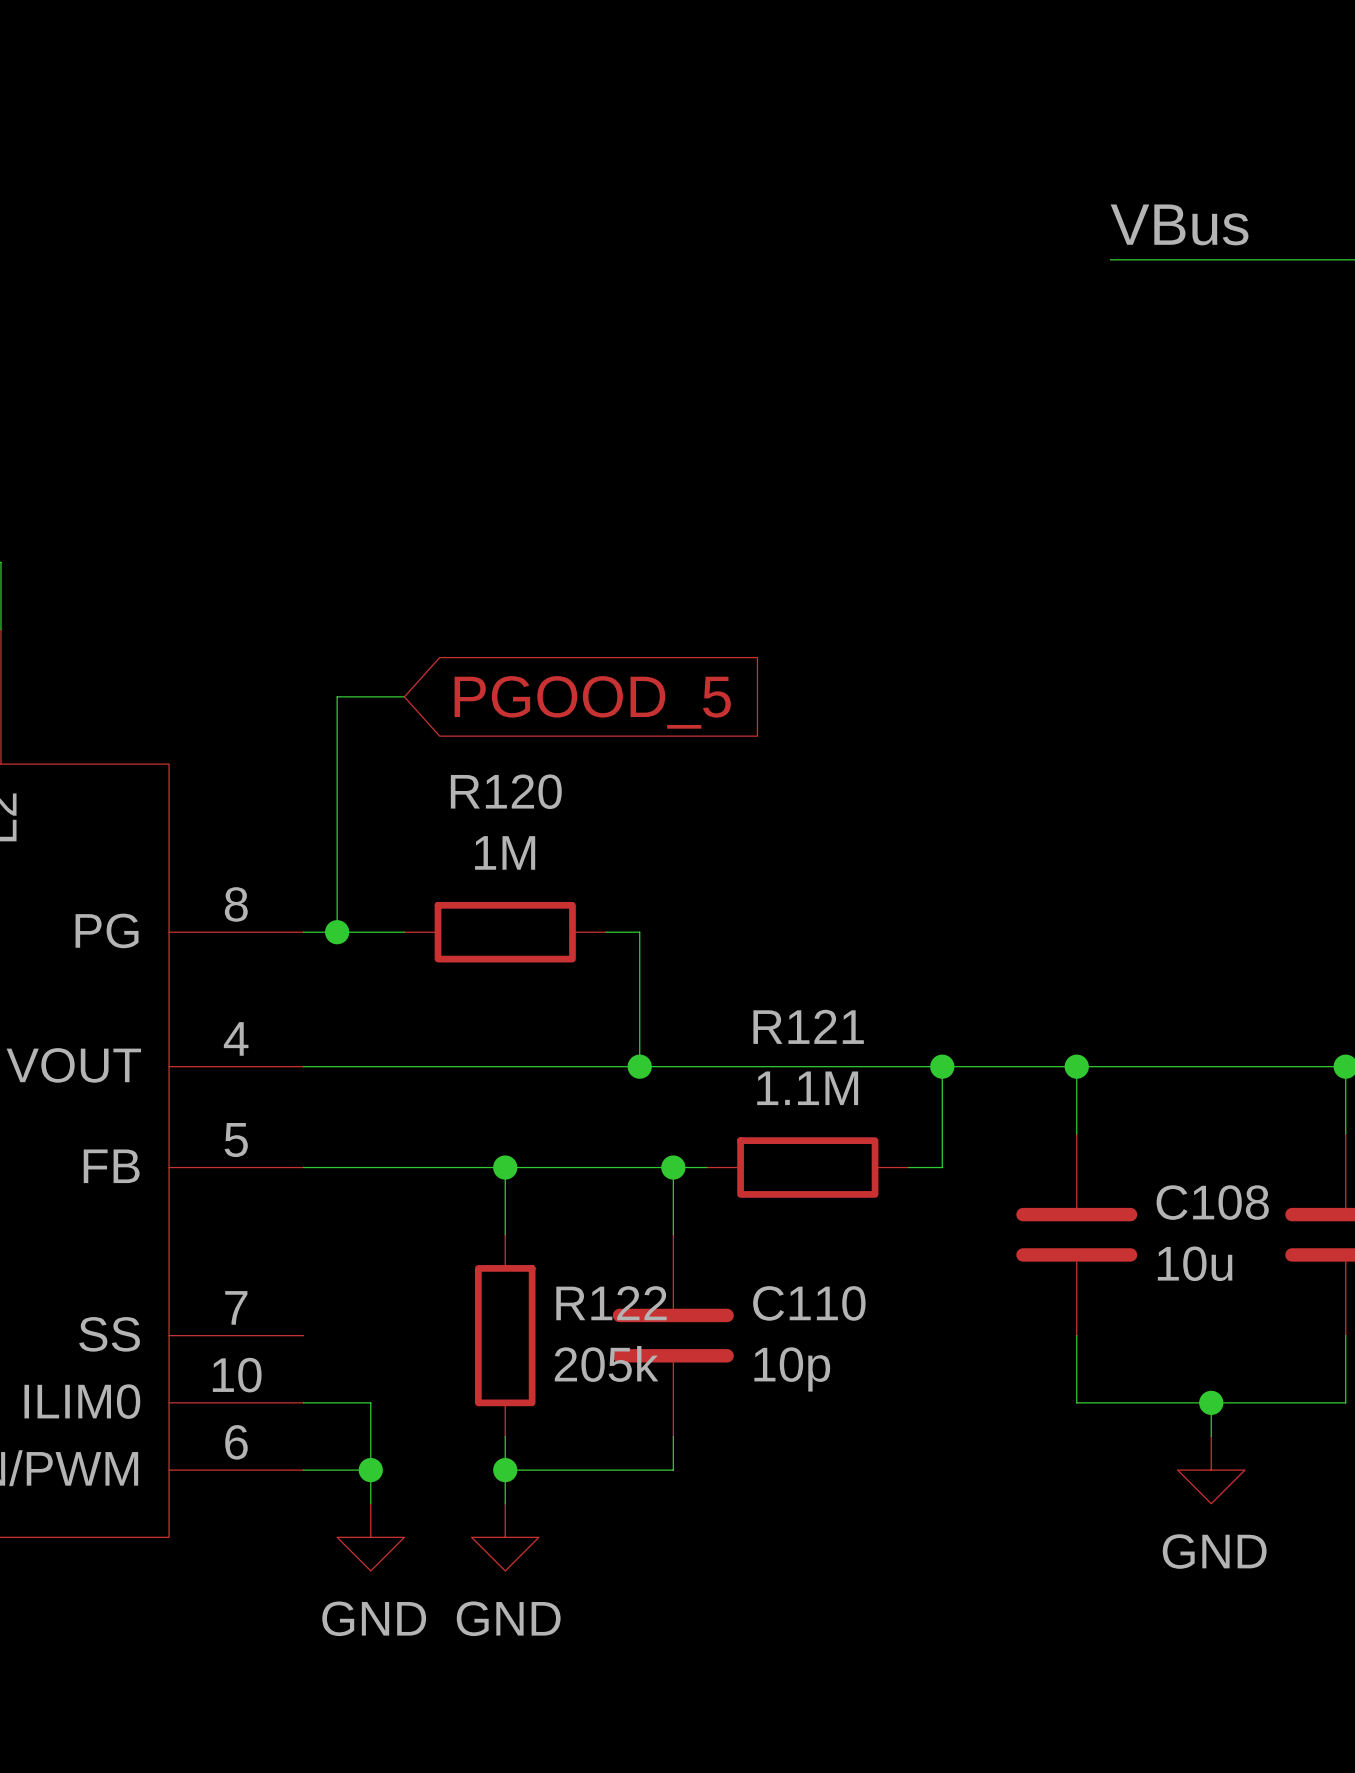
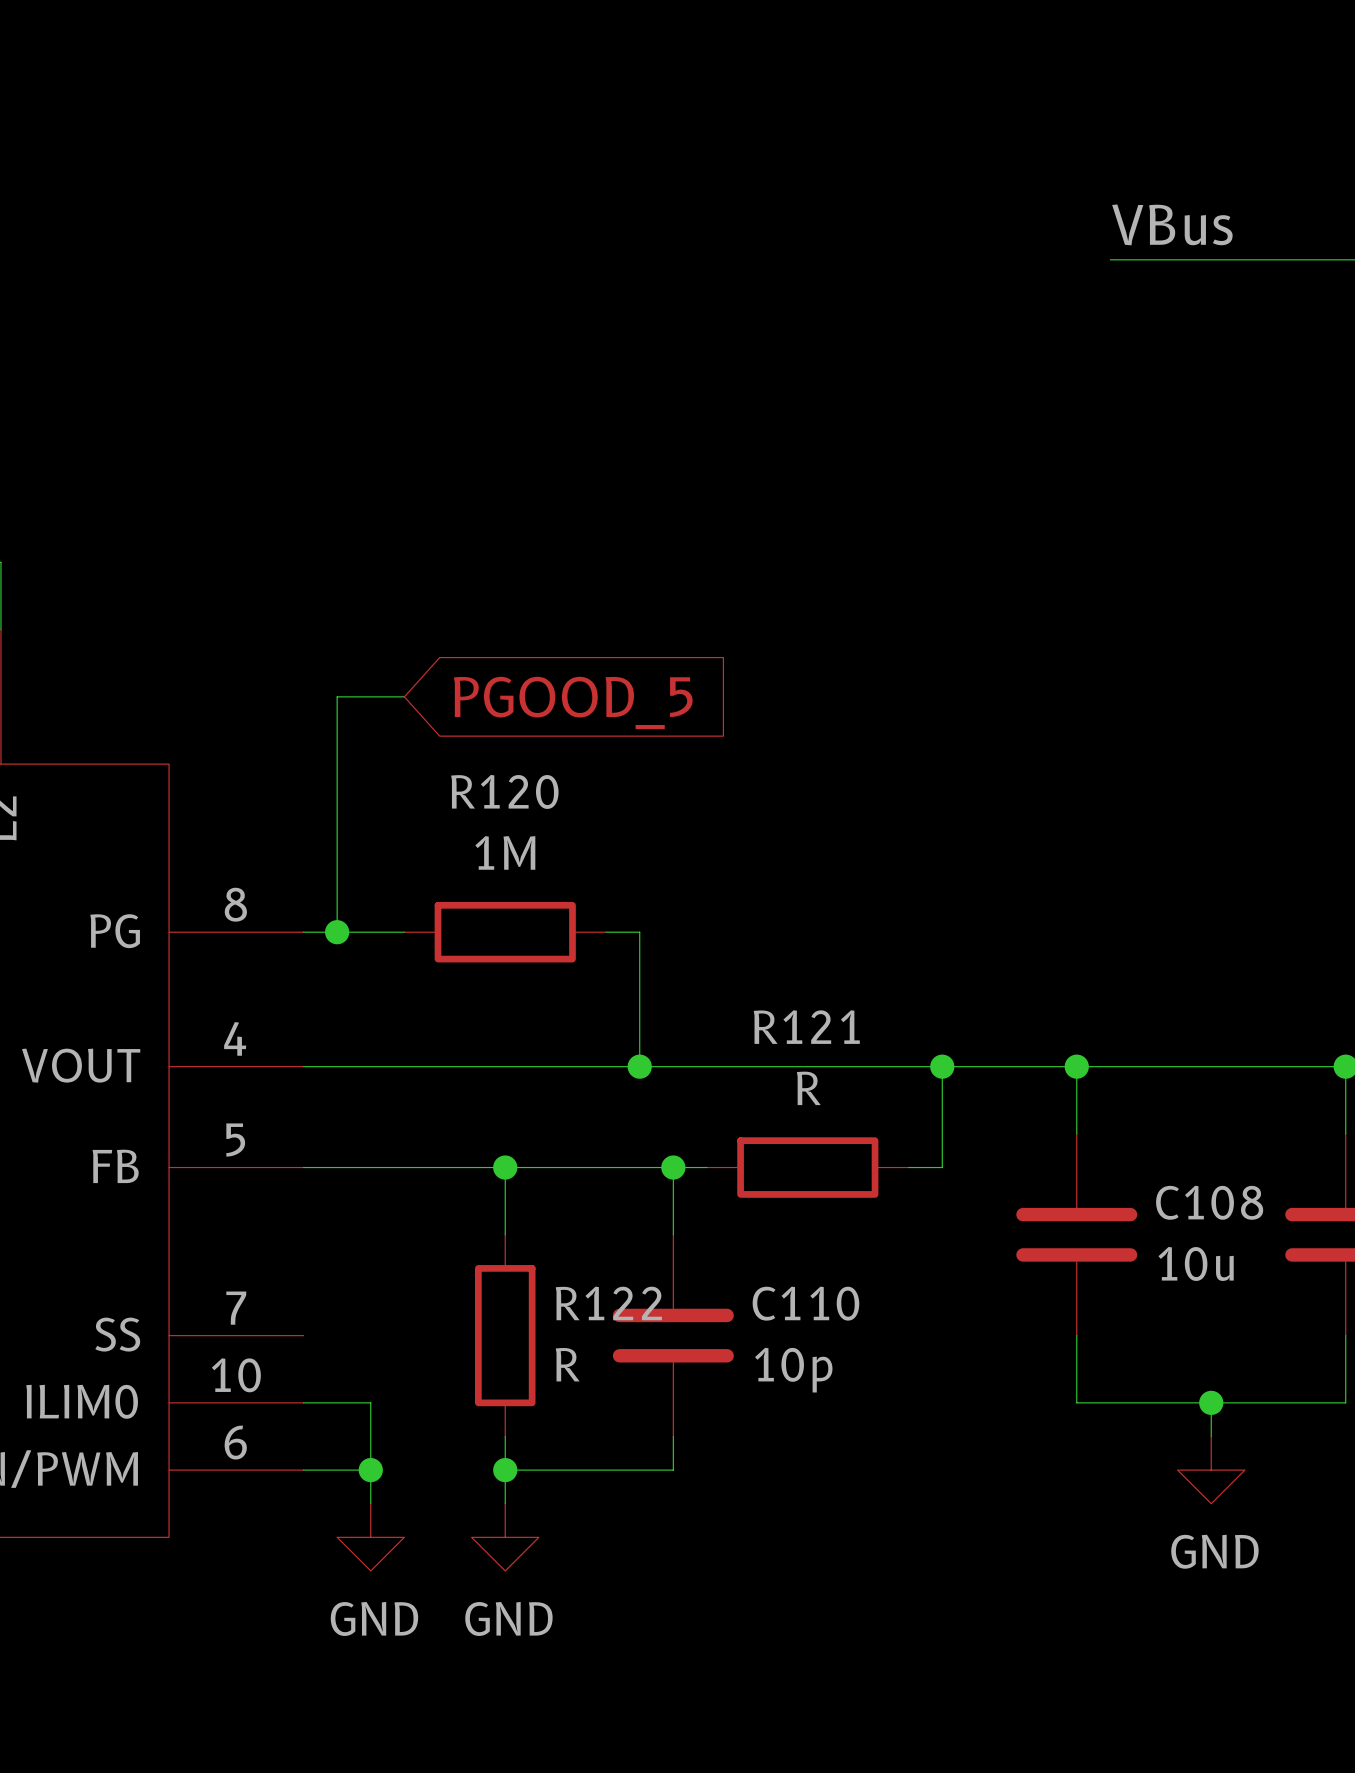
R121 value: 1.1M (807, 1088) -> R (808, 1088)
R122 value: 205k (606, 1363) -> R (567, 1364)

